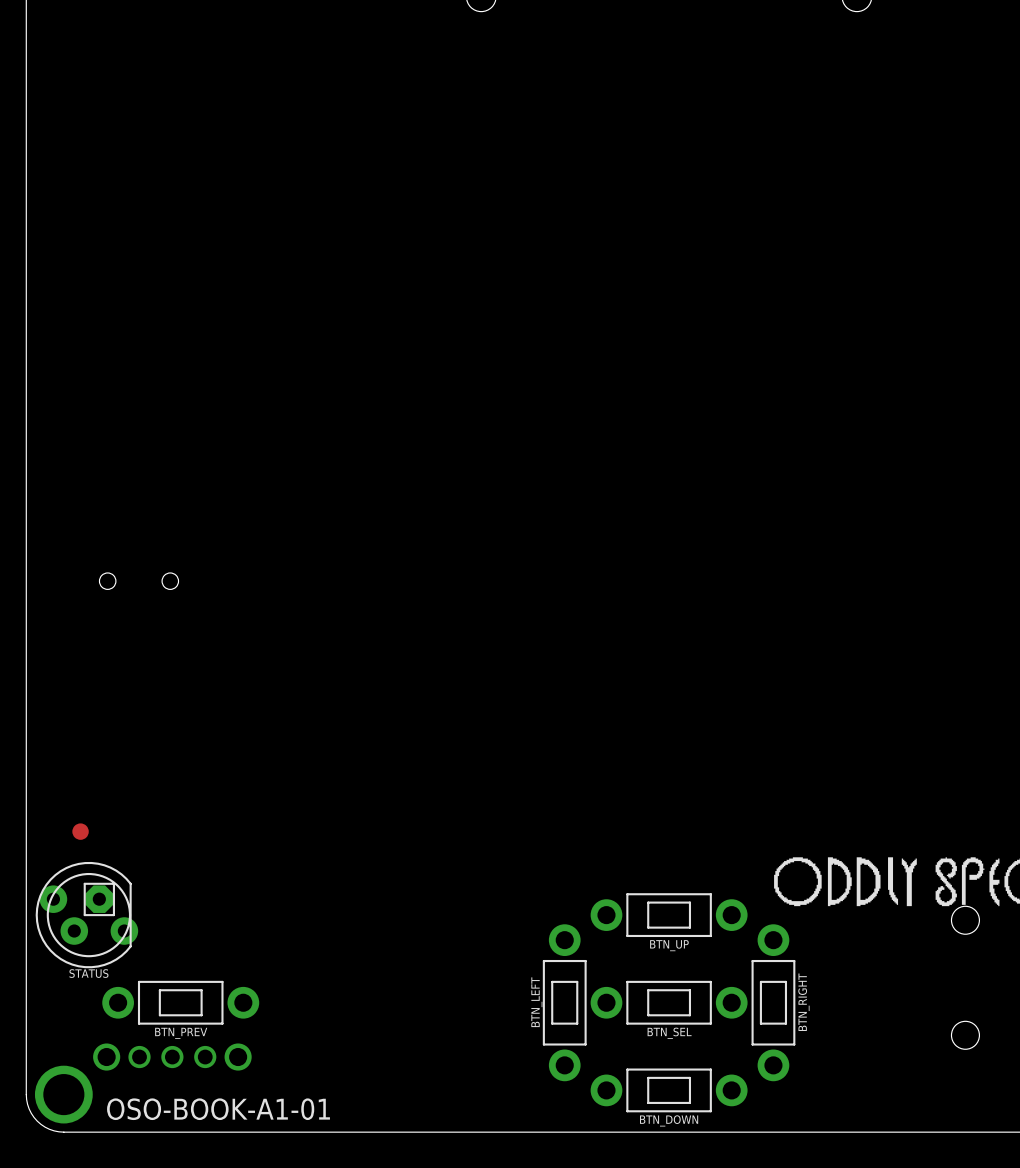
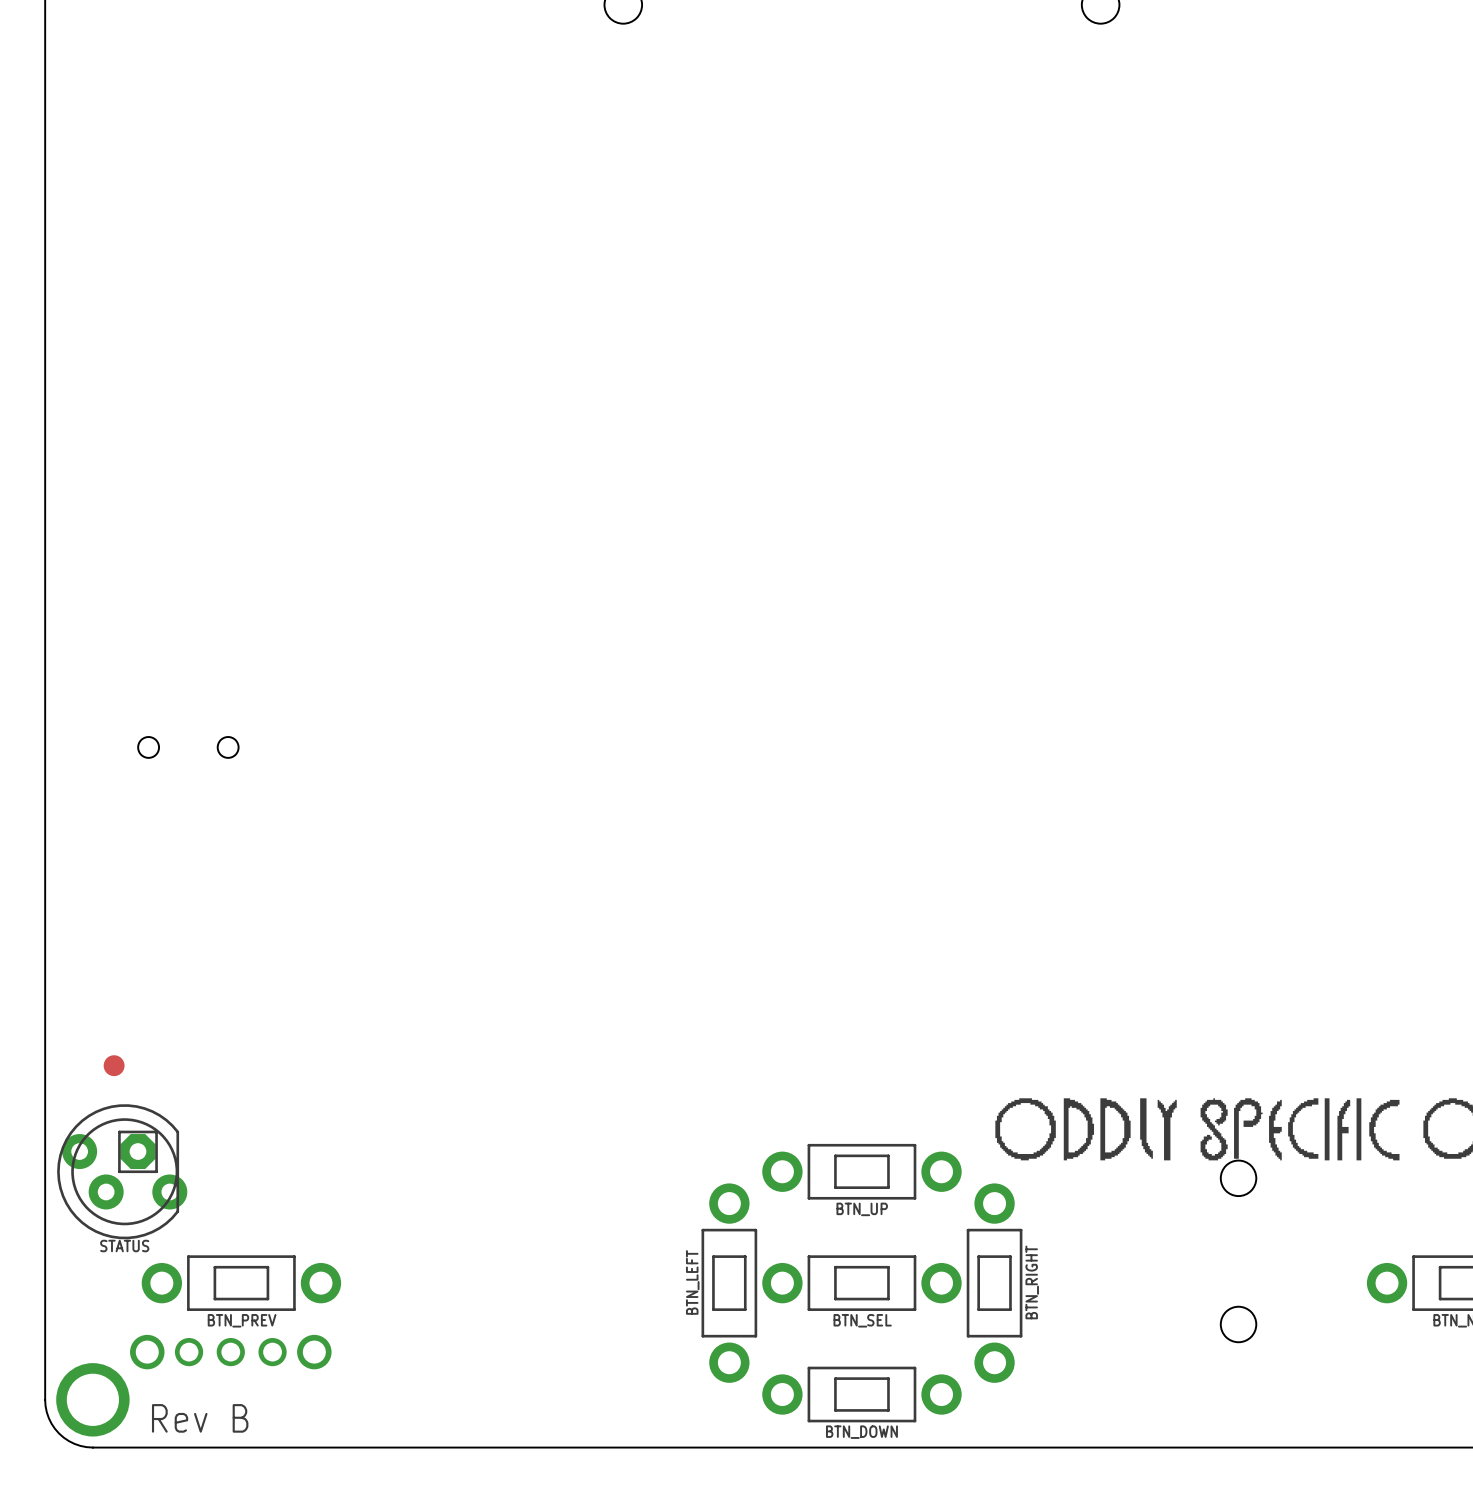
text: OSO-BOOK-A1-01 (218, 1109) -> Rev B (200, 1418)

